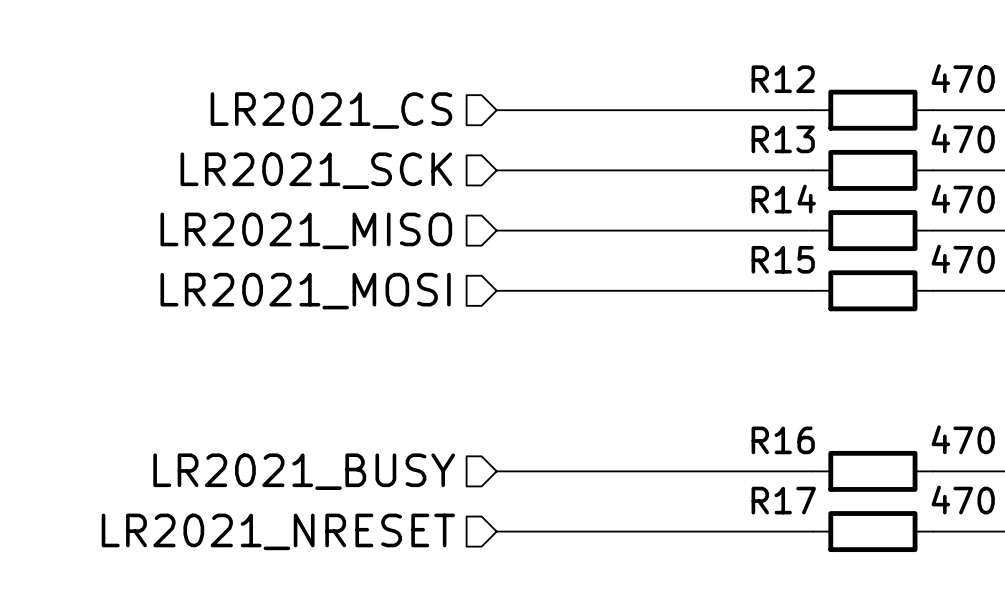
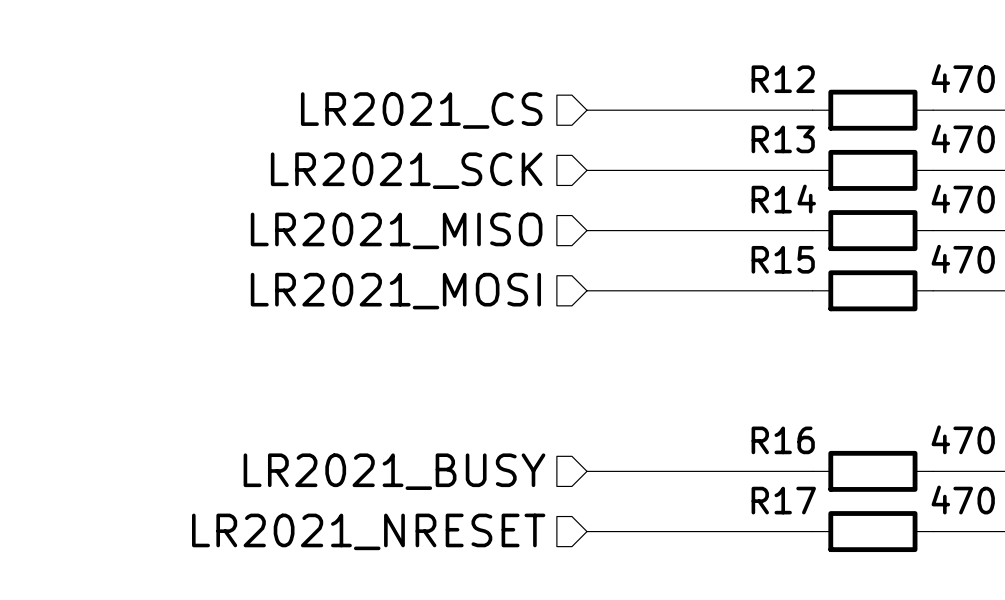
hierarchical label position: LR2021_CS (331, 110) -> LR2021_CS (421, 110)
wire: (496, 110) (586, 110) -> none
hierarchical label position: LR2021_SCK (316, 170) -> LR2021_SCK (406, 170)
wire: (496, 170) (586, 170) -> none
hierarchical label position: LR2021_MISO (306, 230) -> LR2021_MISO (396, 230)
wire: (496, 230) (586, 230) -> none
wire: (496, 290) (586, 290) -> none
hierarchical label position: LR2021_MOSI (305, 291) -> LR2021_MOSI (395, 291)
hierarchical label position: LR2021_BUSY (304, 471) -> LR2021_BUSY (394, 471)
wire: (496, 471) (586, 471) -> none
hierarchical label position: LR2021_NRESET (278, 531) -> LR2021_NRESET (368, 531)
wire: (496, 531) (586, 531) -> none

